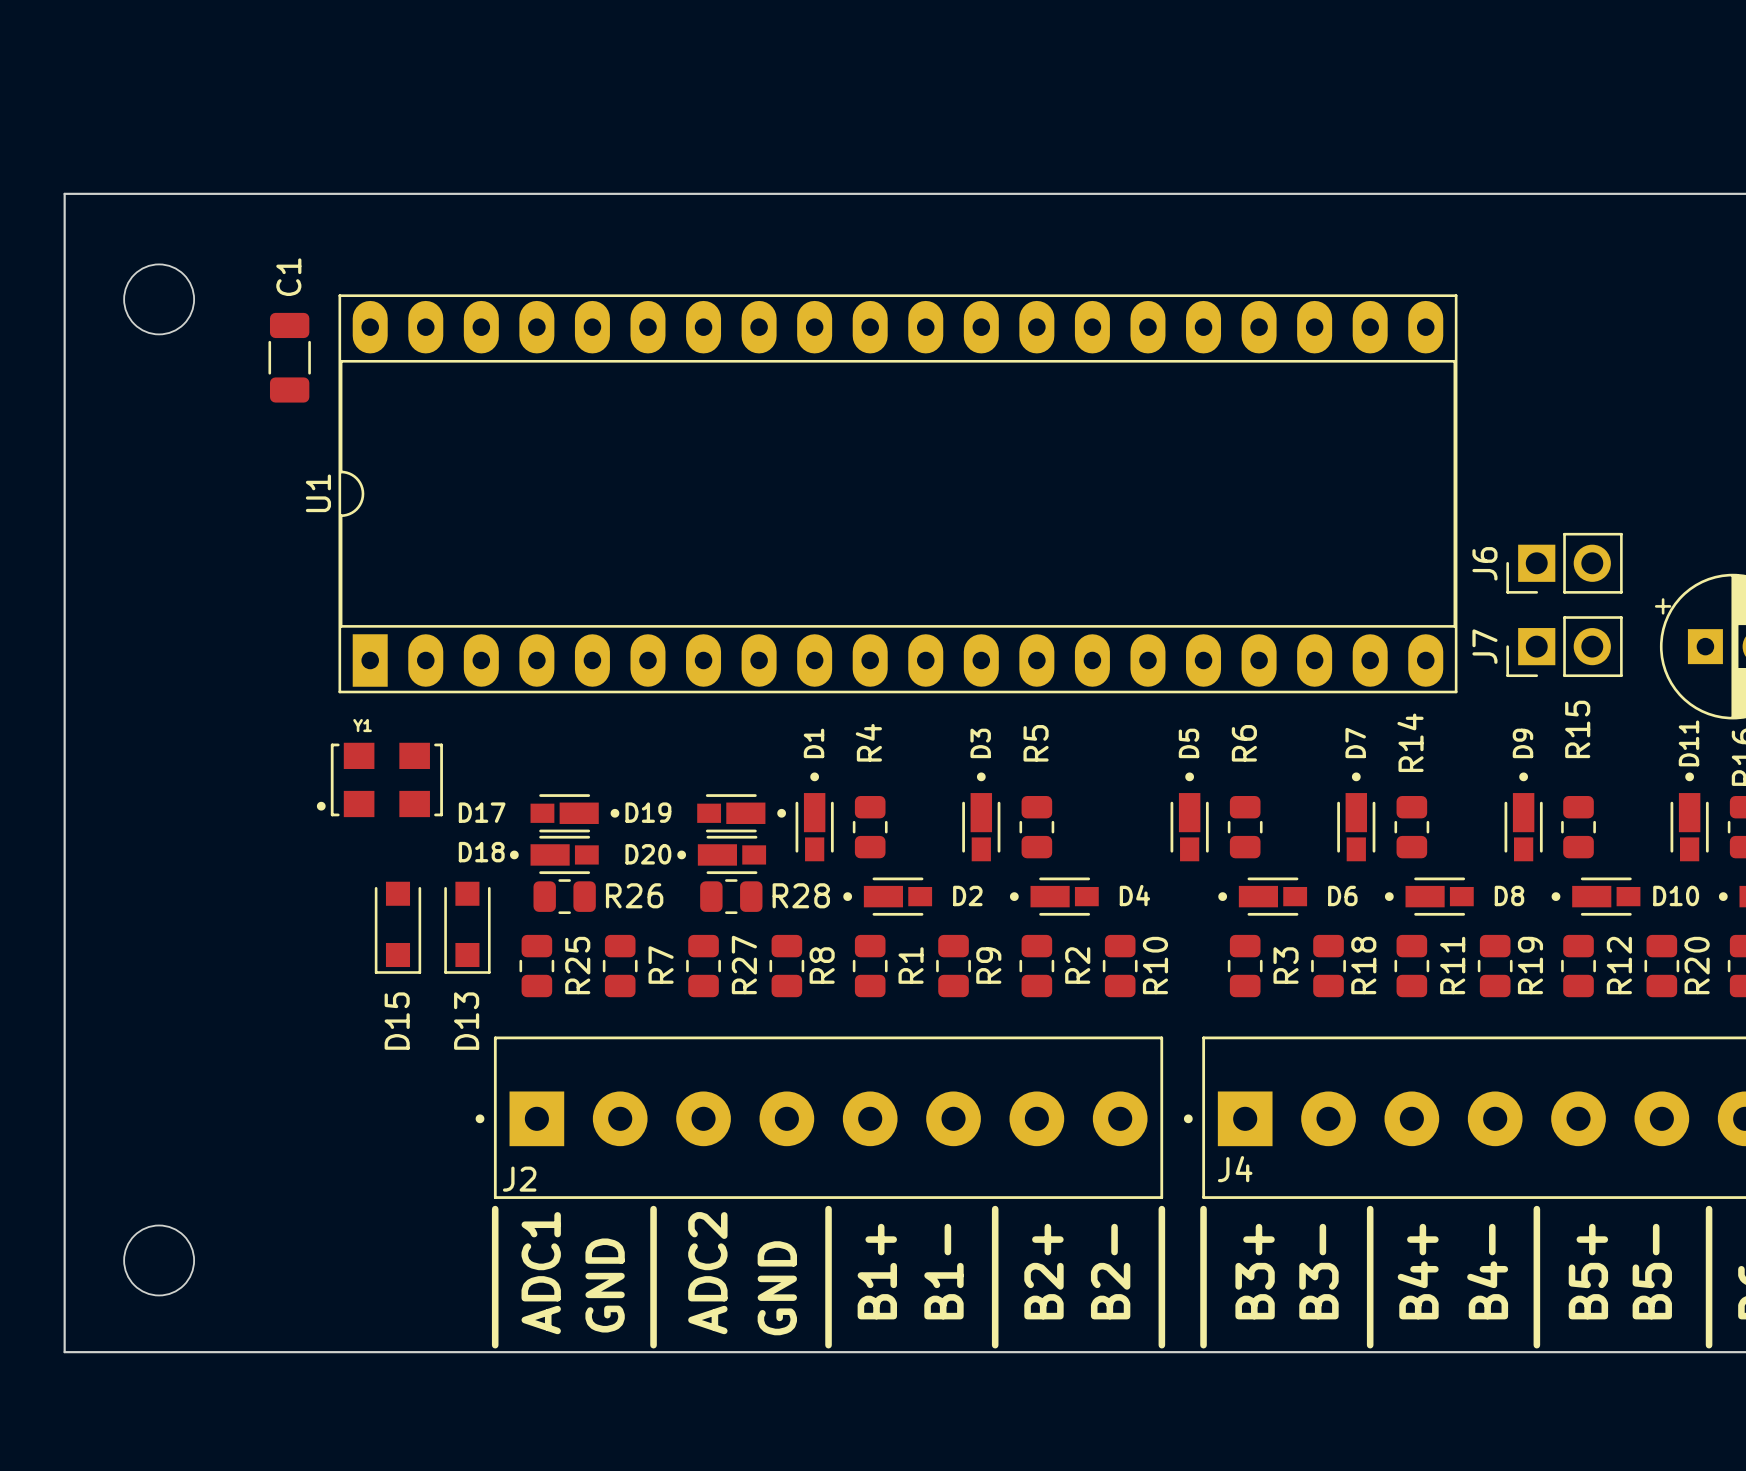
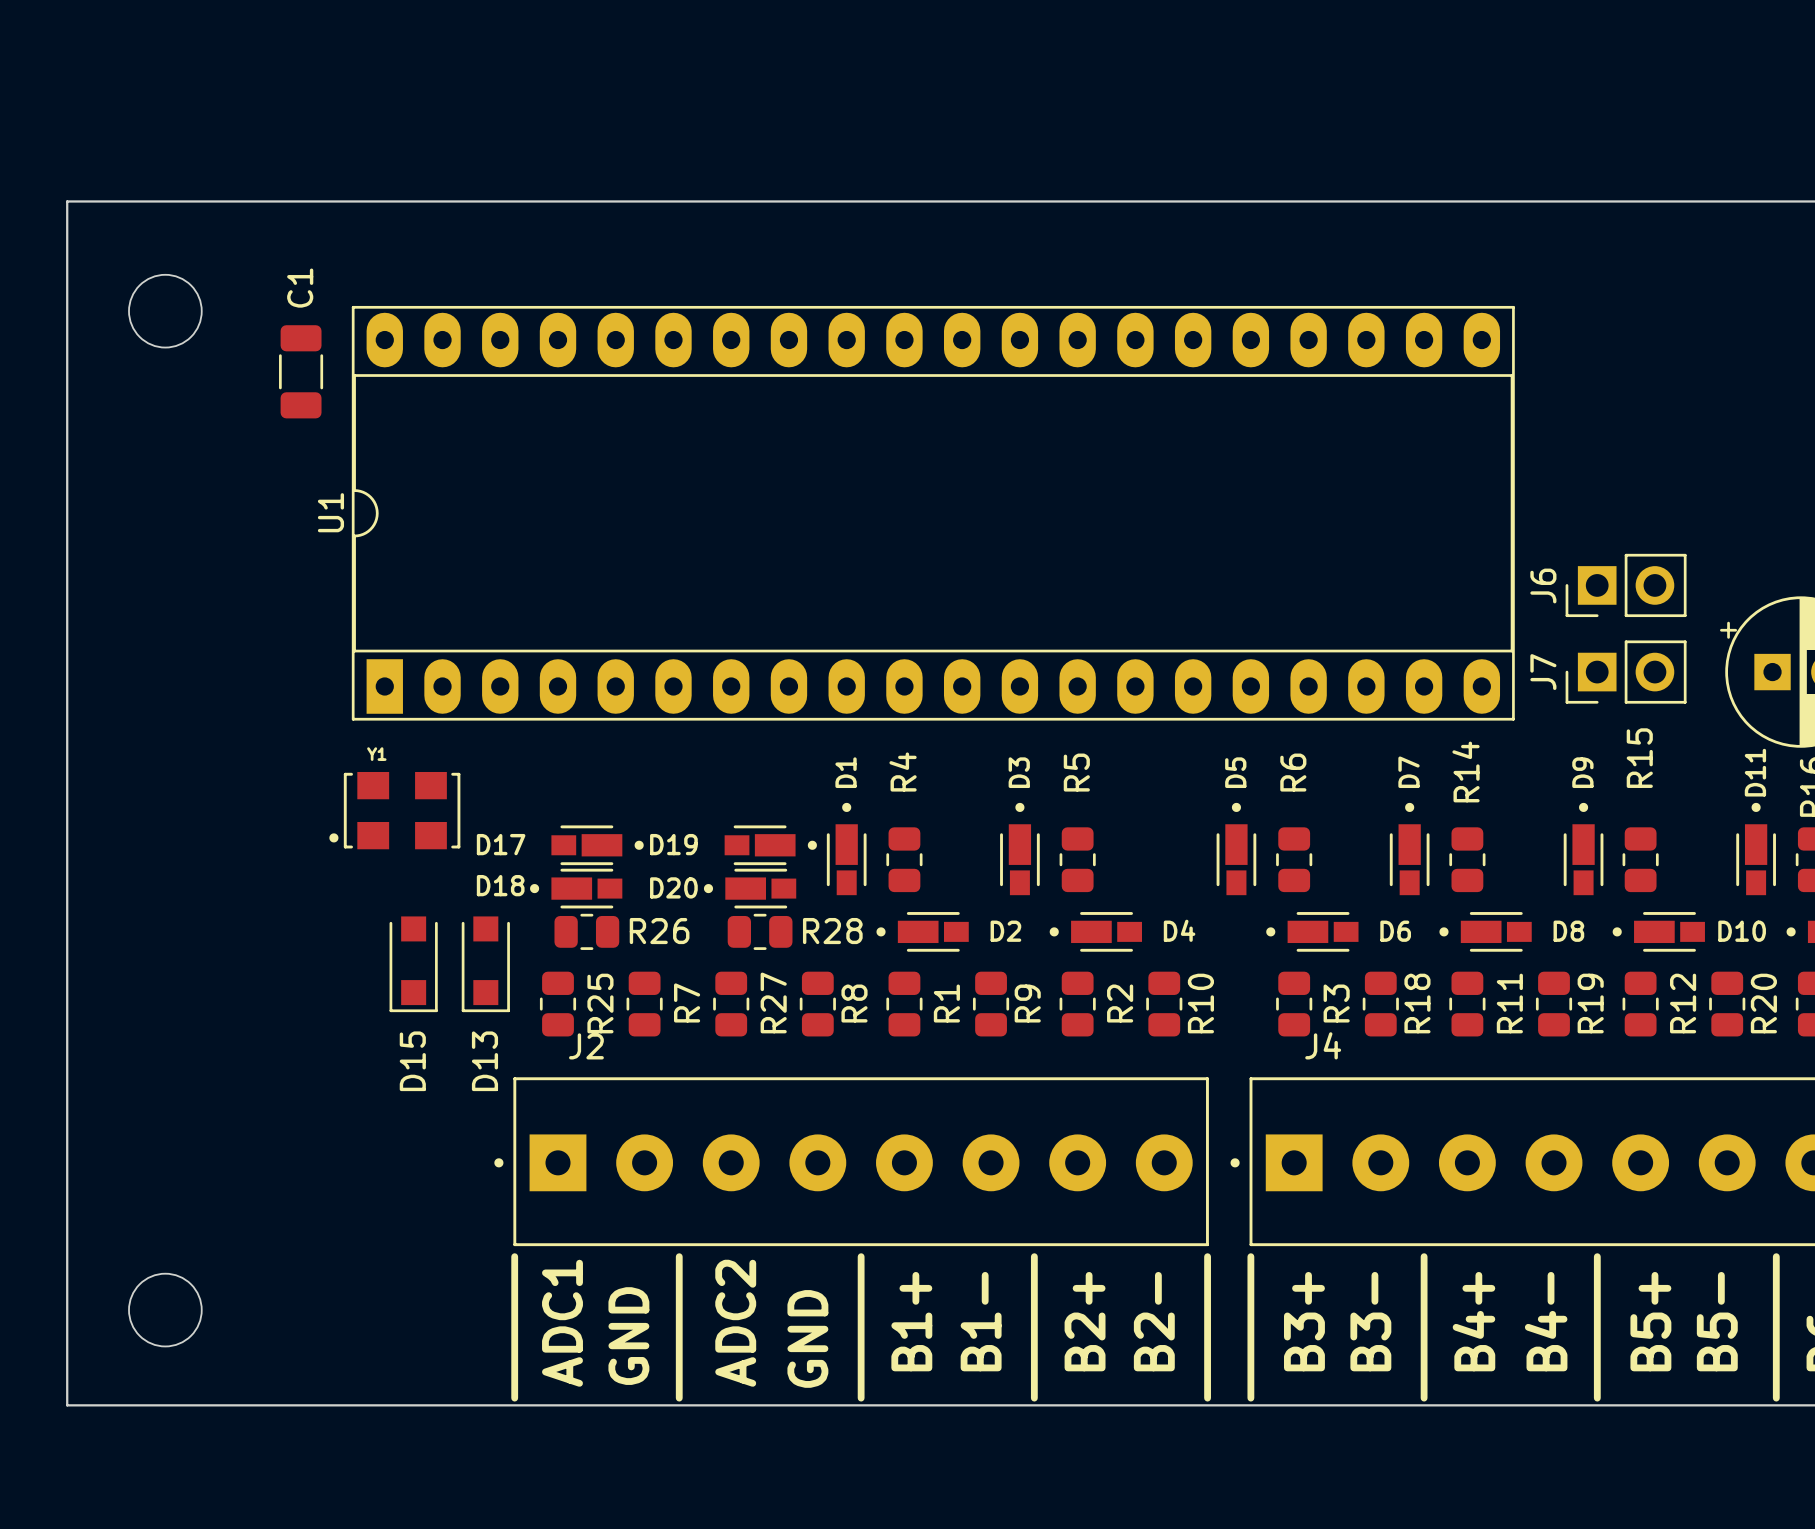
J4 name position: J4 (1235, 1169) -> J4 (1323, 1045)
J2 name position: J2 (519, 1179) -> J2 (586, 1046)

